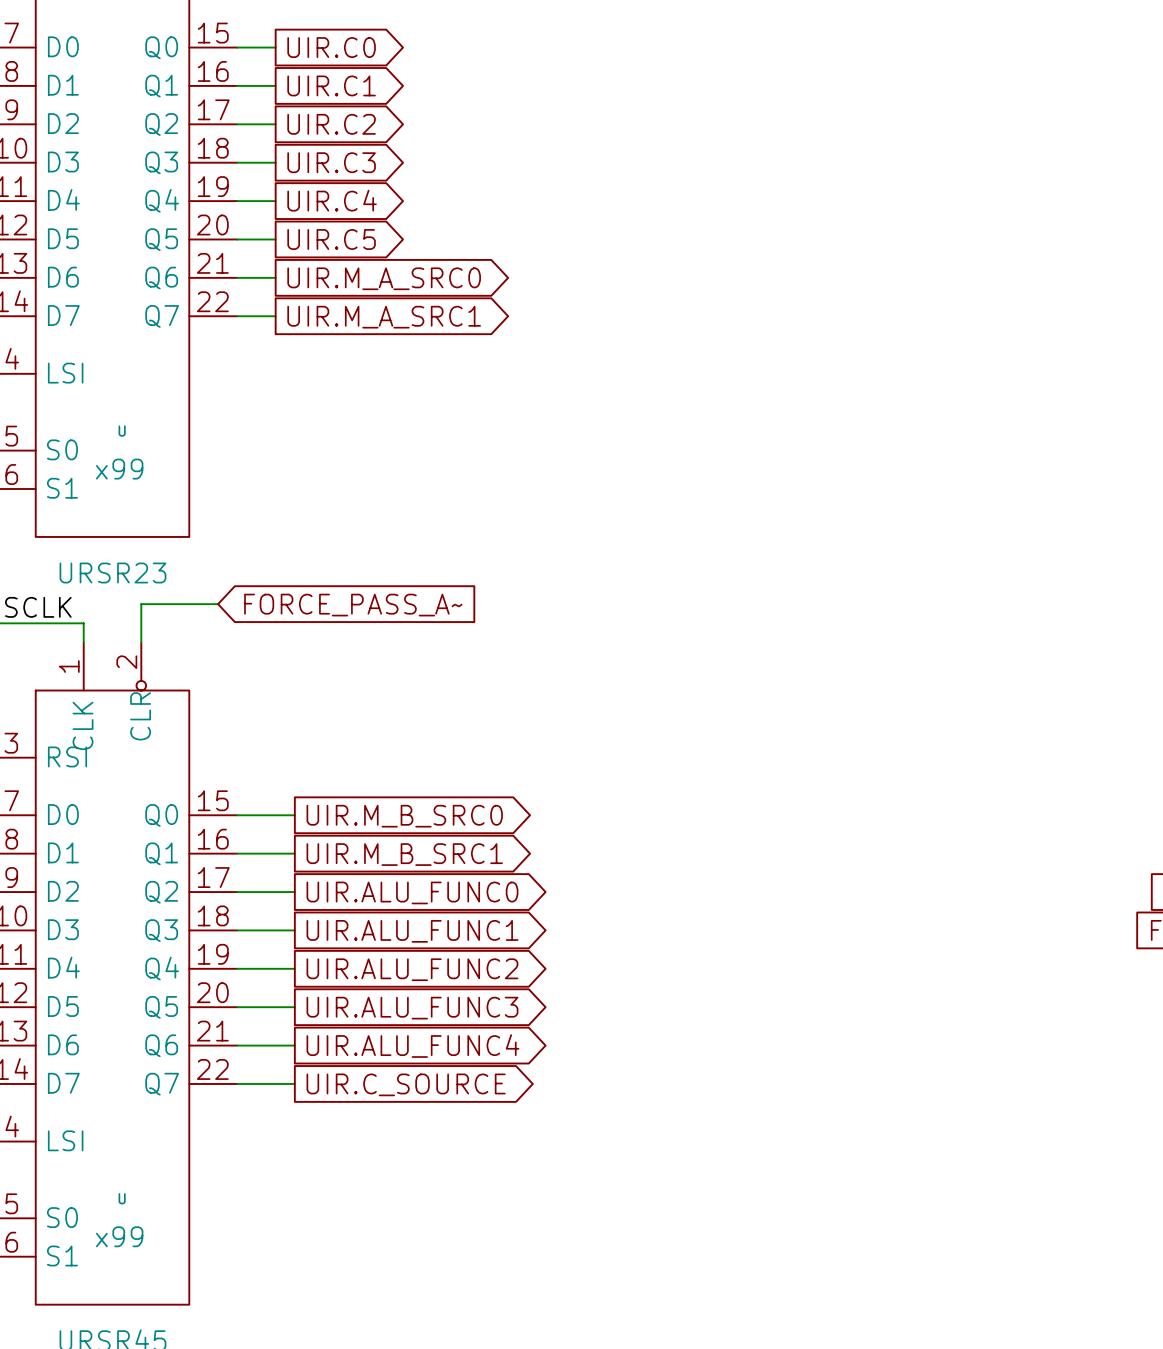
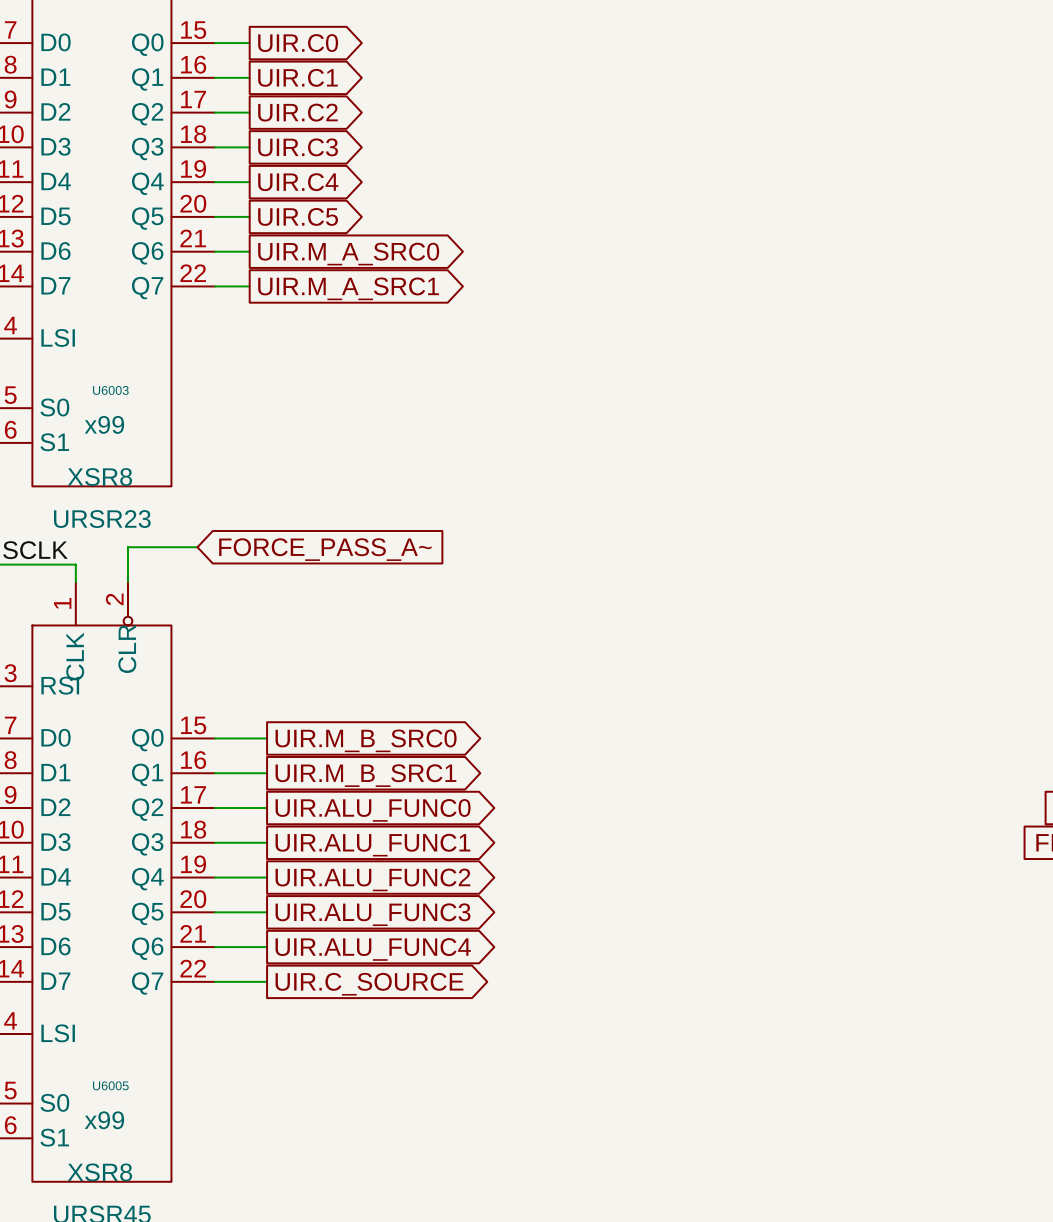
U name: U (122, 431) -> U6003 (110, 390)
U value: none -> XSR8 (99, 477)
U name: U (122, 1198) -> U6005 (110, 1085)
U value: none -> XSR8 (99, 1172)

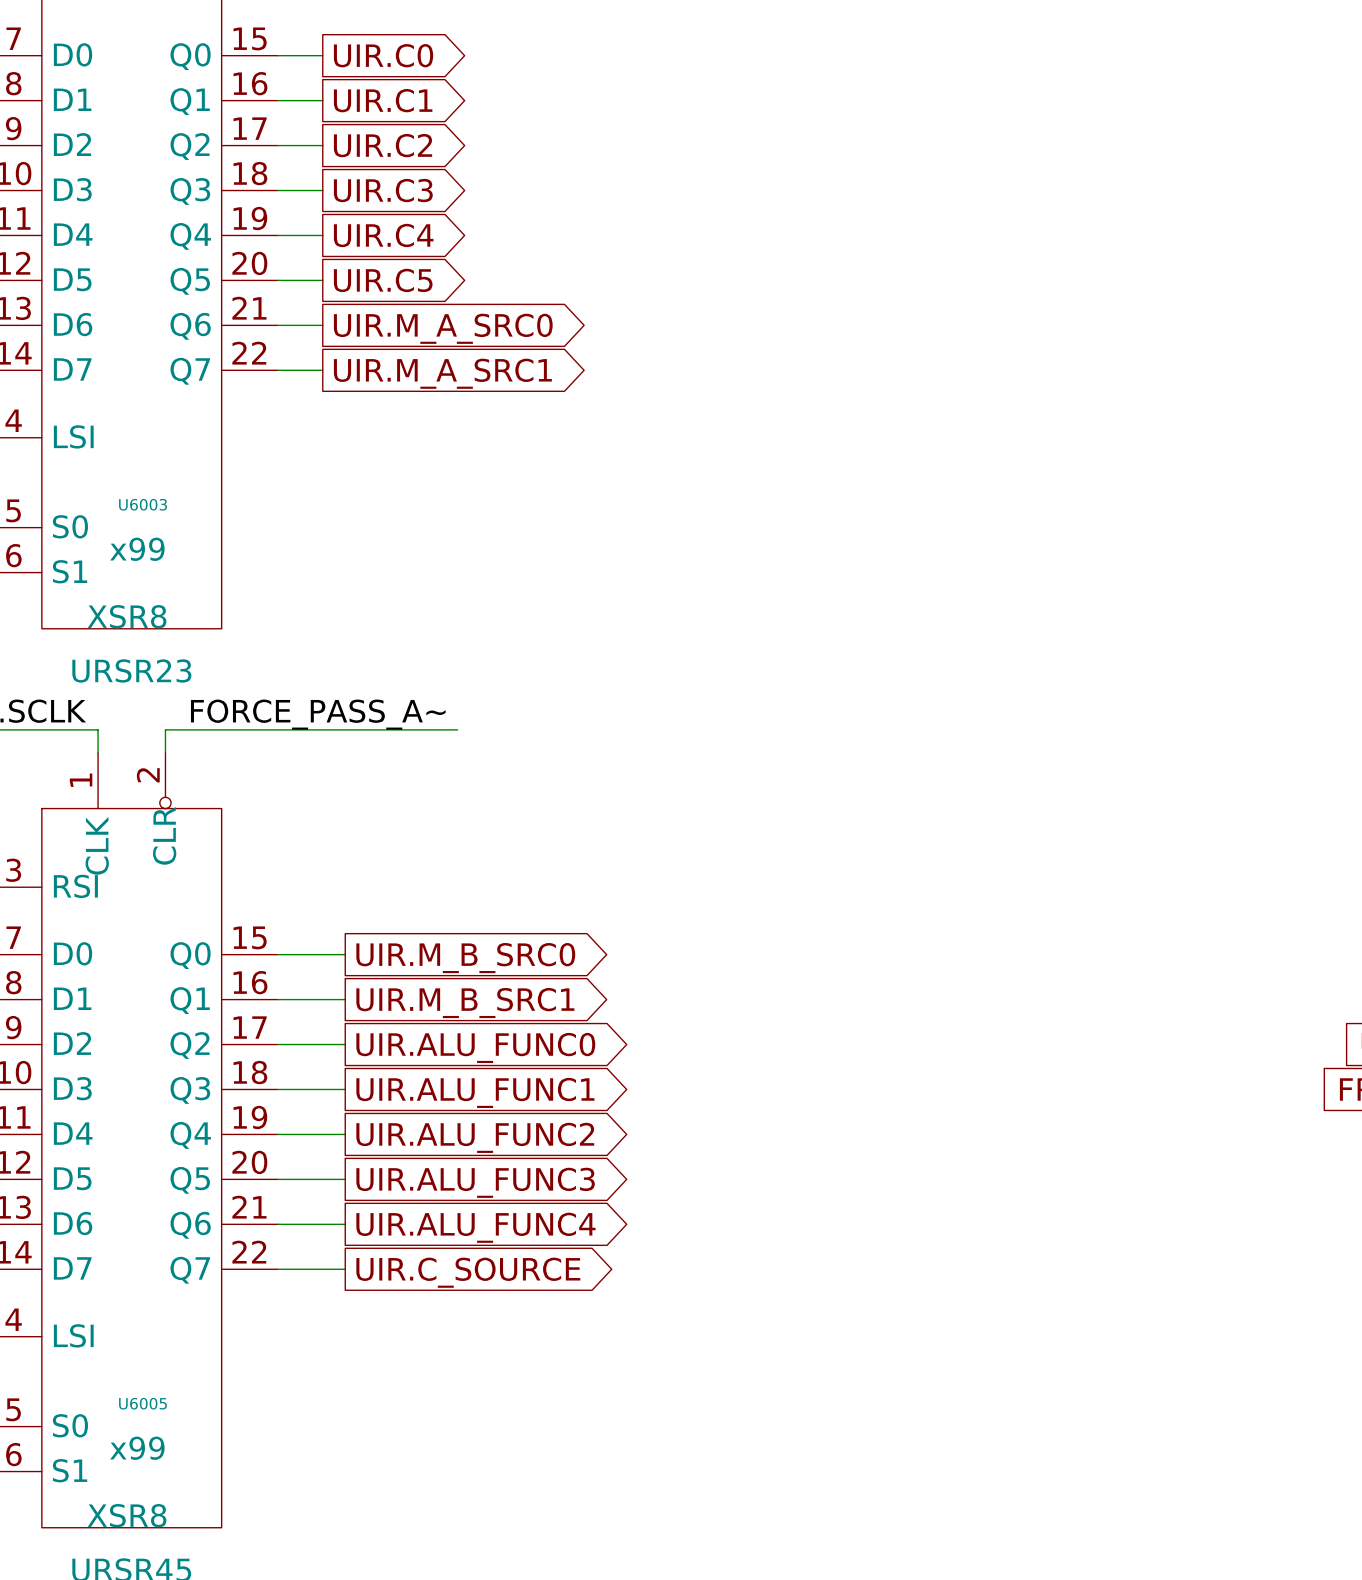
wire: (197, 547) (127, 547) (127, 564) -> (457, 729) (165, 729)
global label: FORCE_PASS_A~ (325, 549) -> none
label: none -> FORCE_PASS_A~ (318, 714)

